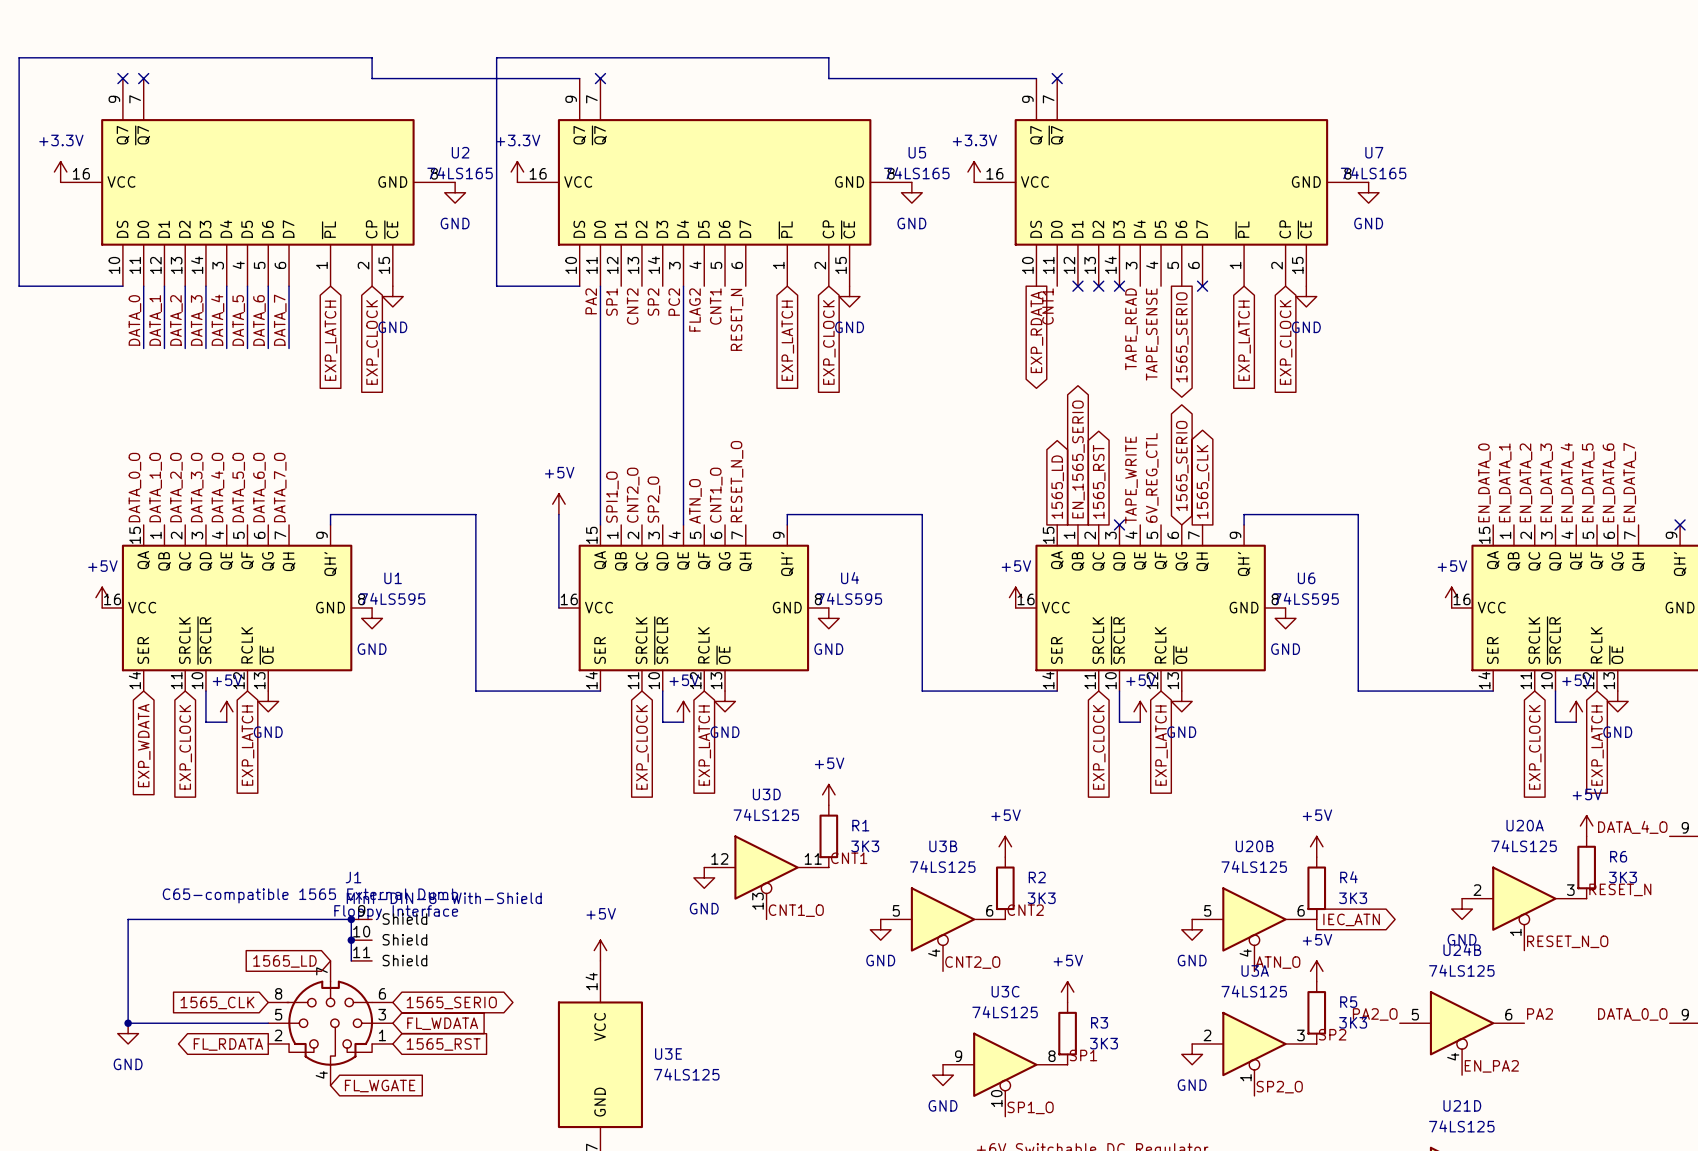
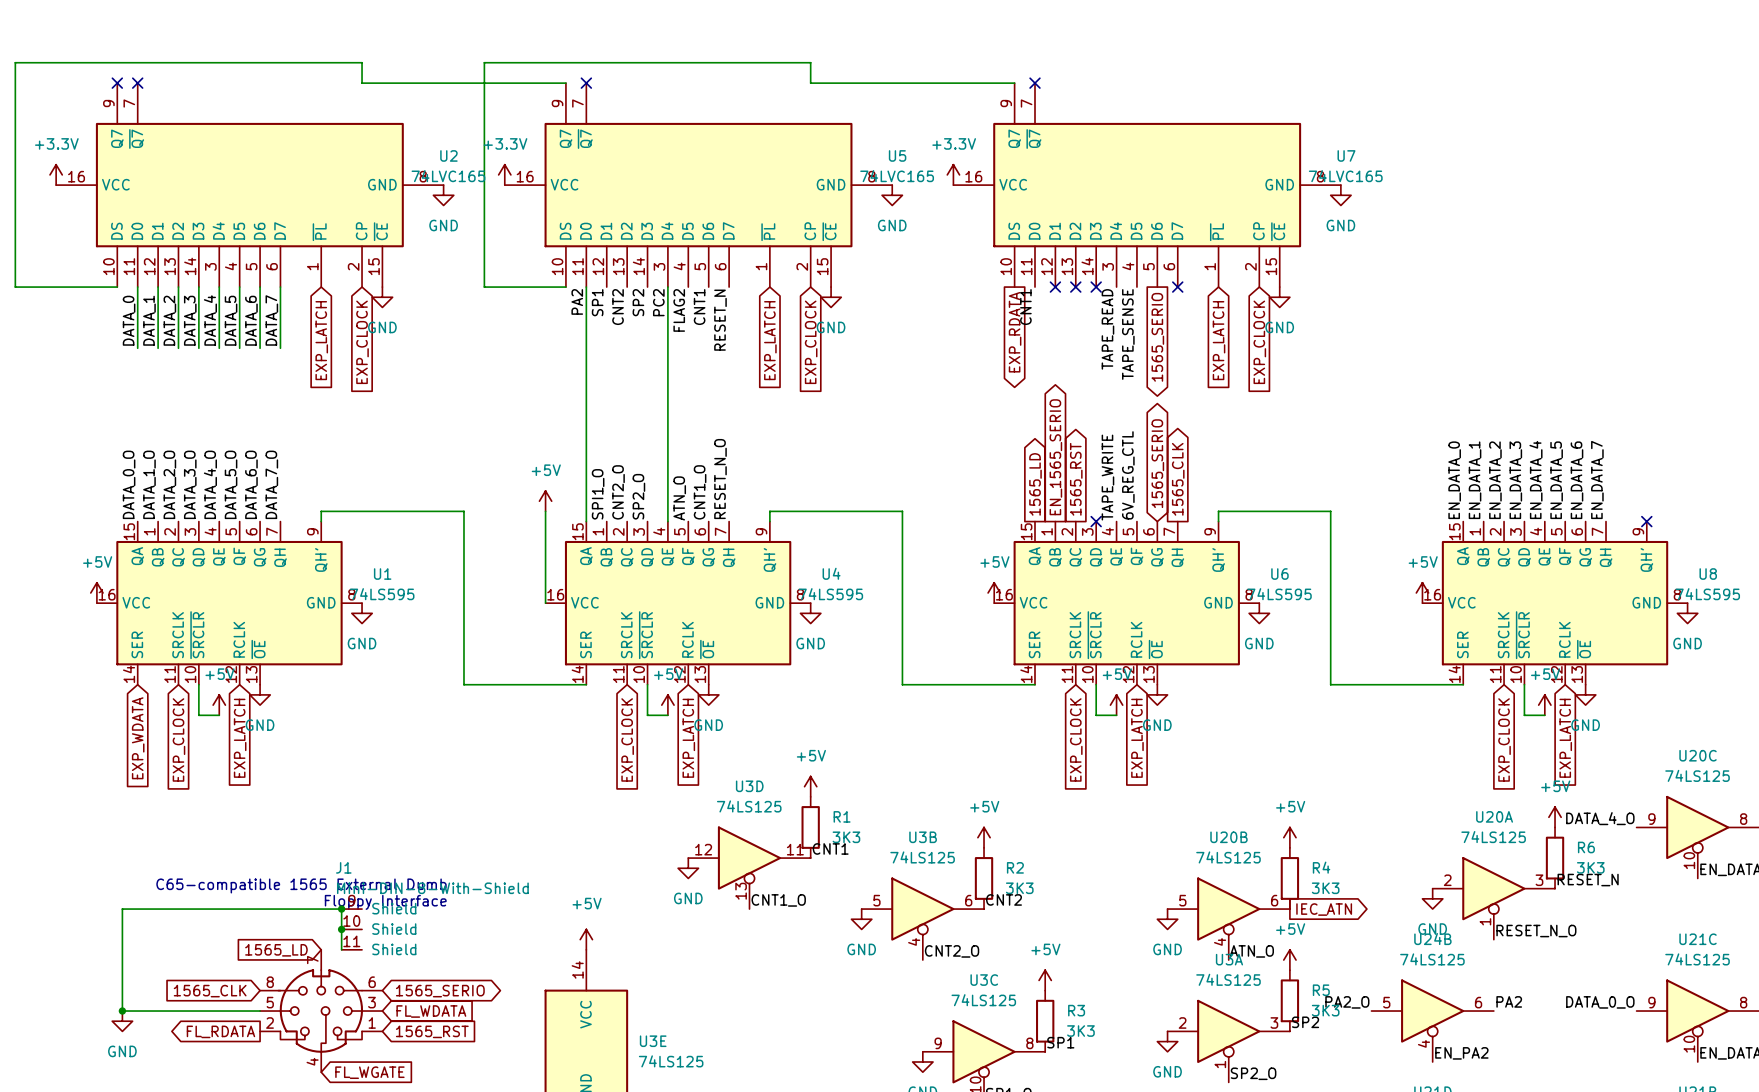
U2 value: 74LS165 (460, 173) -> 74LVC165 (448, 176)
U5 value: 74LS165 (916, 173) -> 74LVC165 (897, 176)
U7 value: 74LS165 (1373, 173) -> 74LVC165 (1345, 176)

